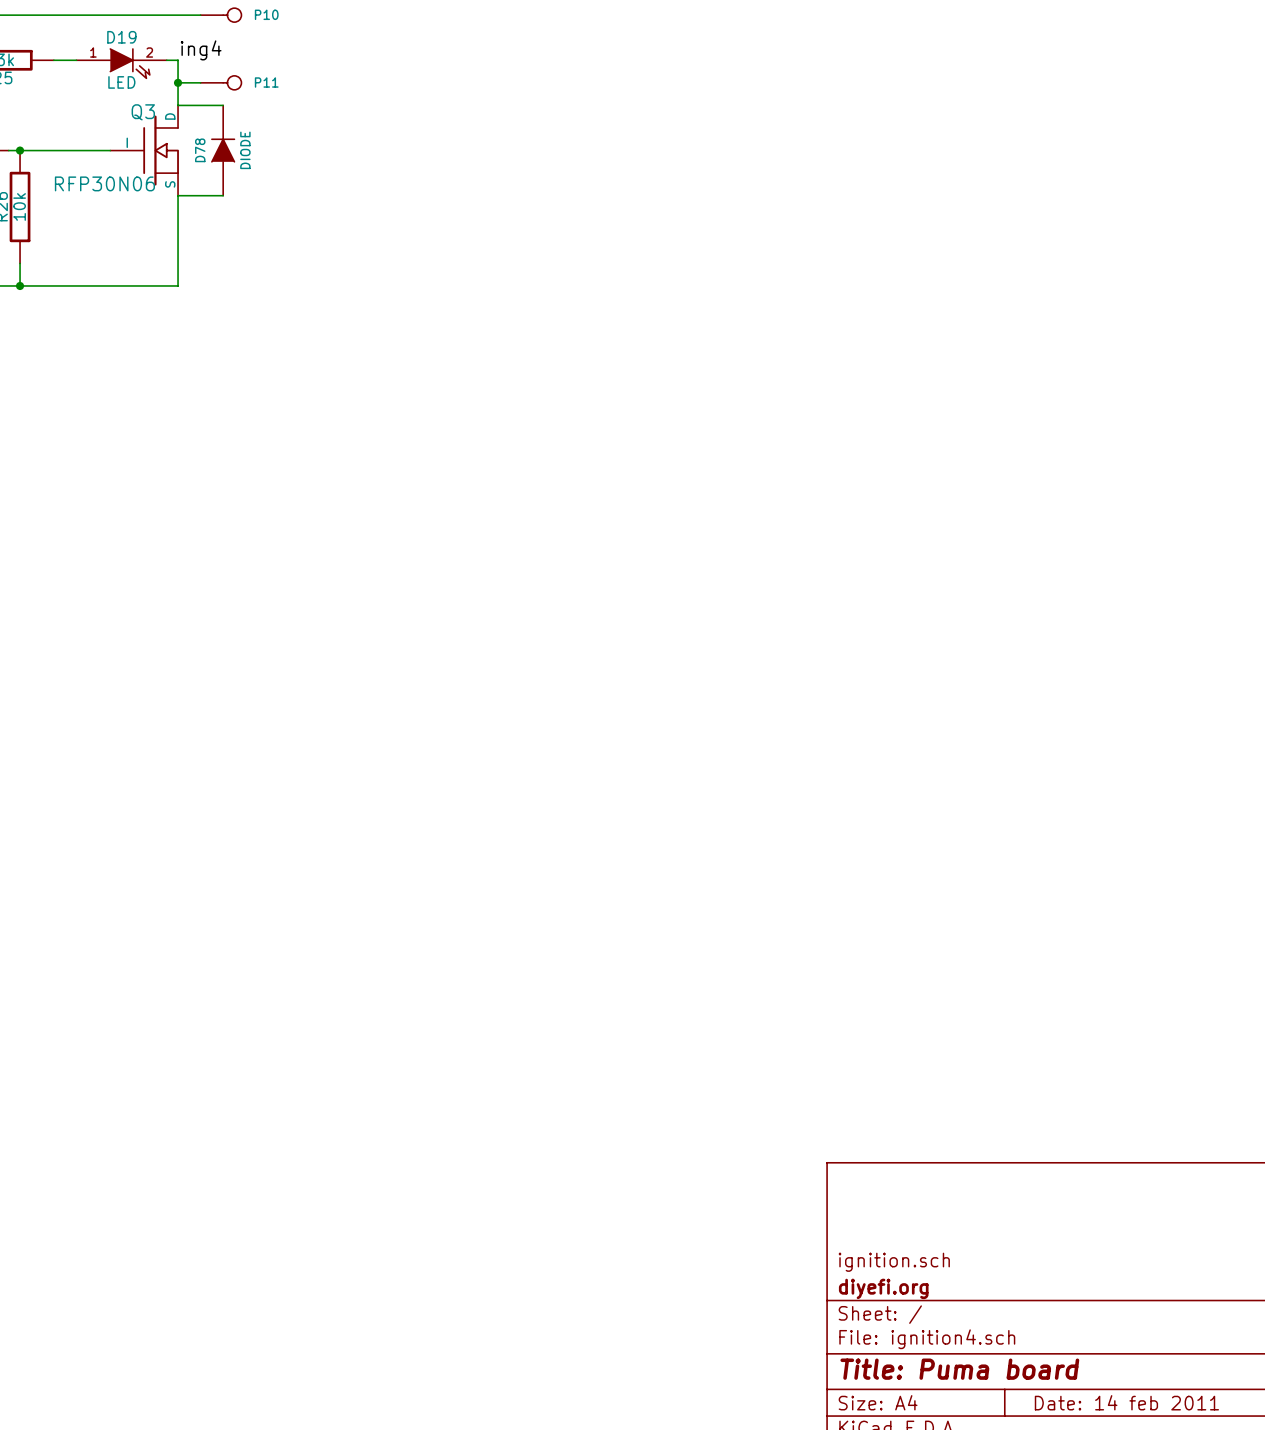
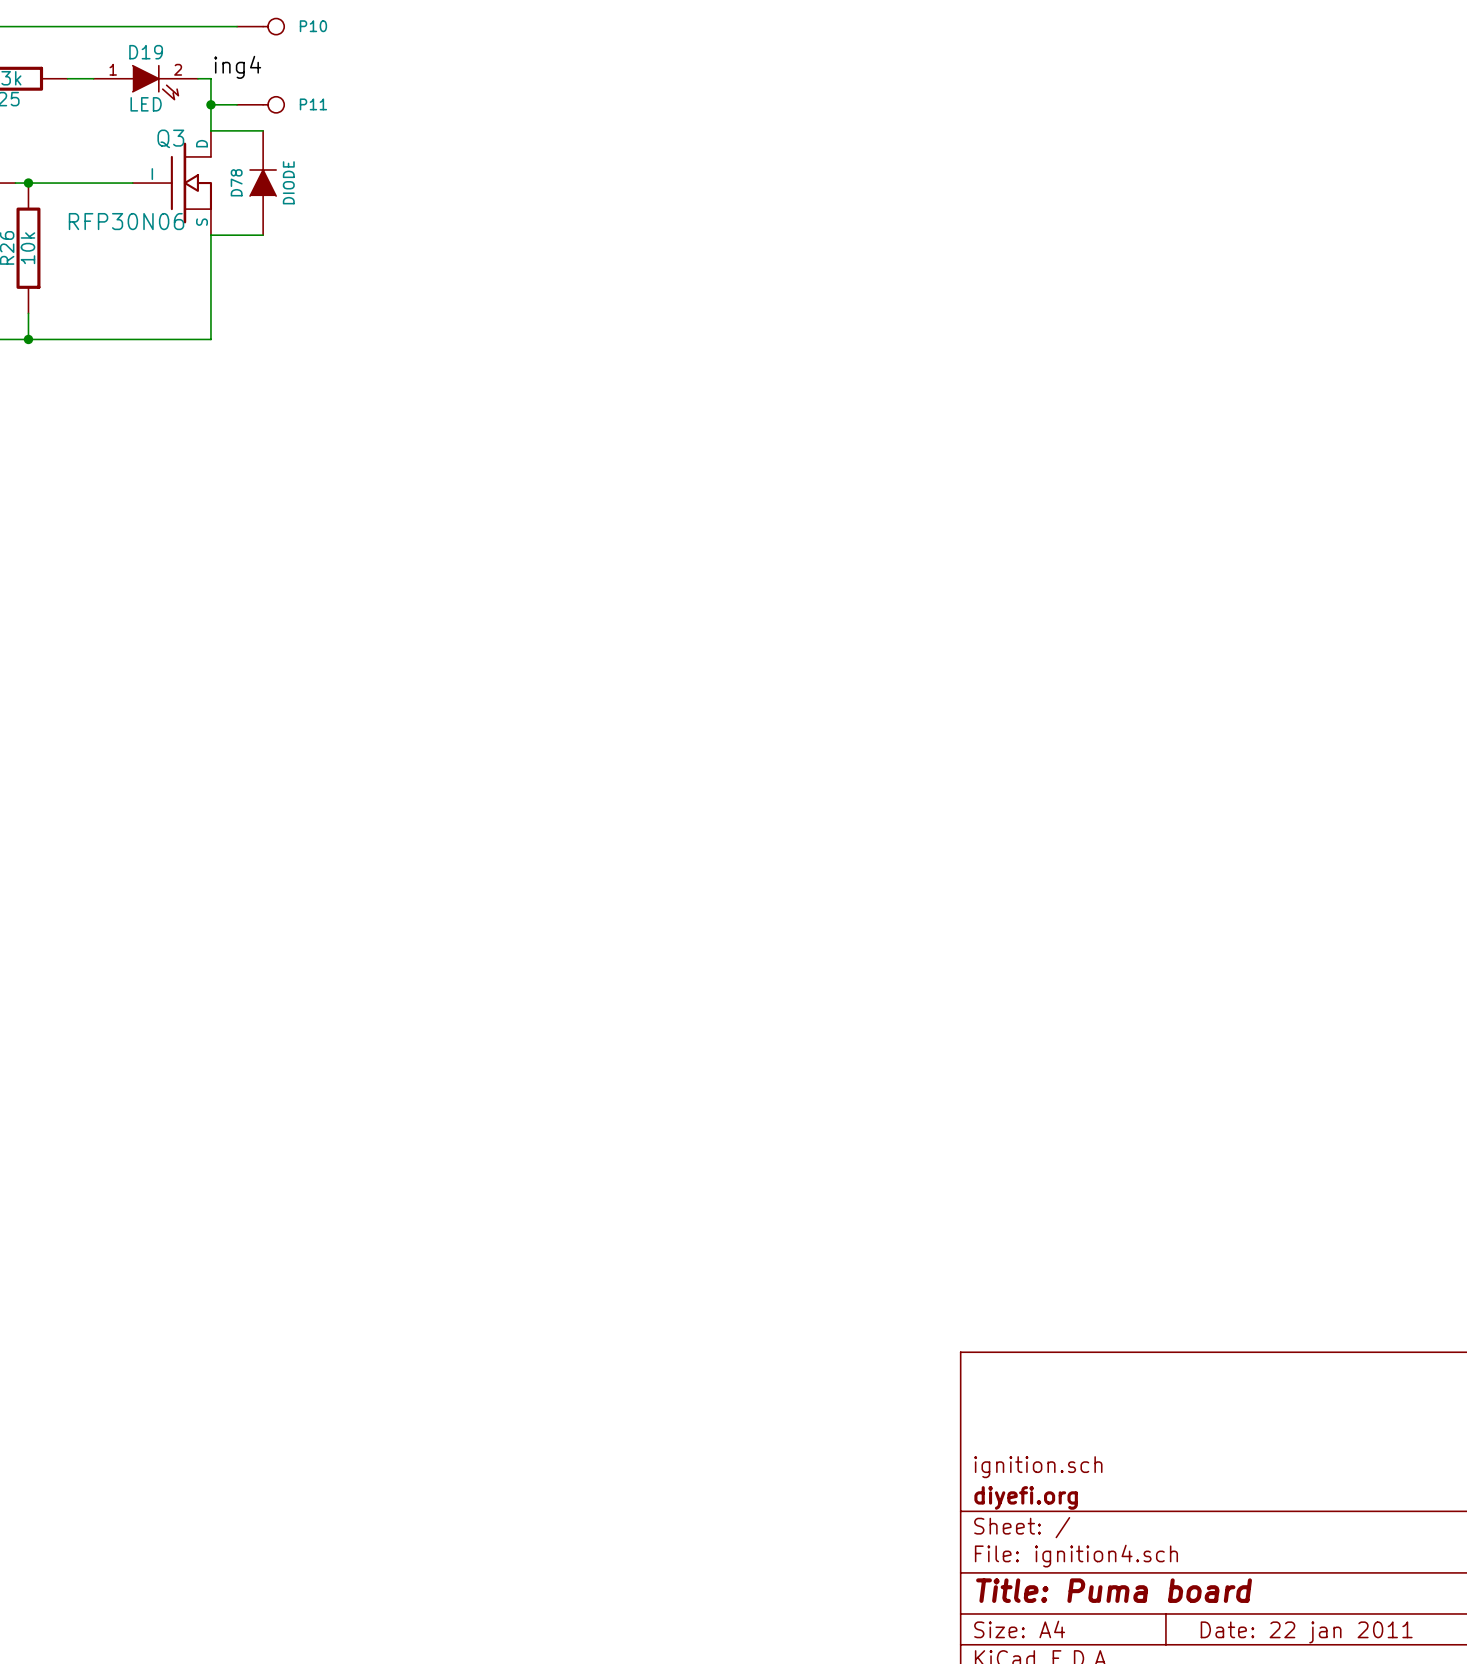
title block: Date: 14 feb 2011 (1126, 1402) -> Date: 22 jan 2011 (1306, 1632)

